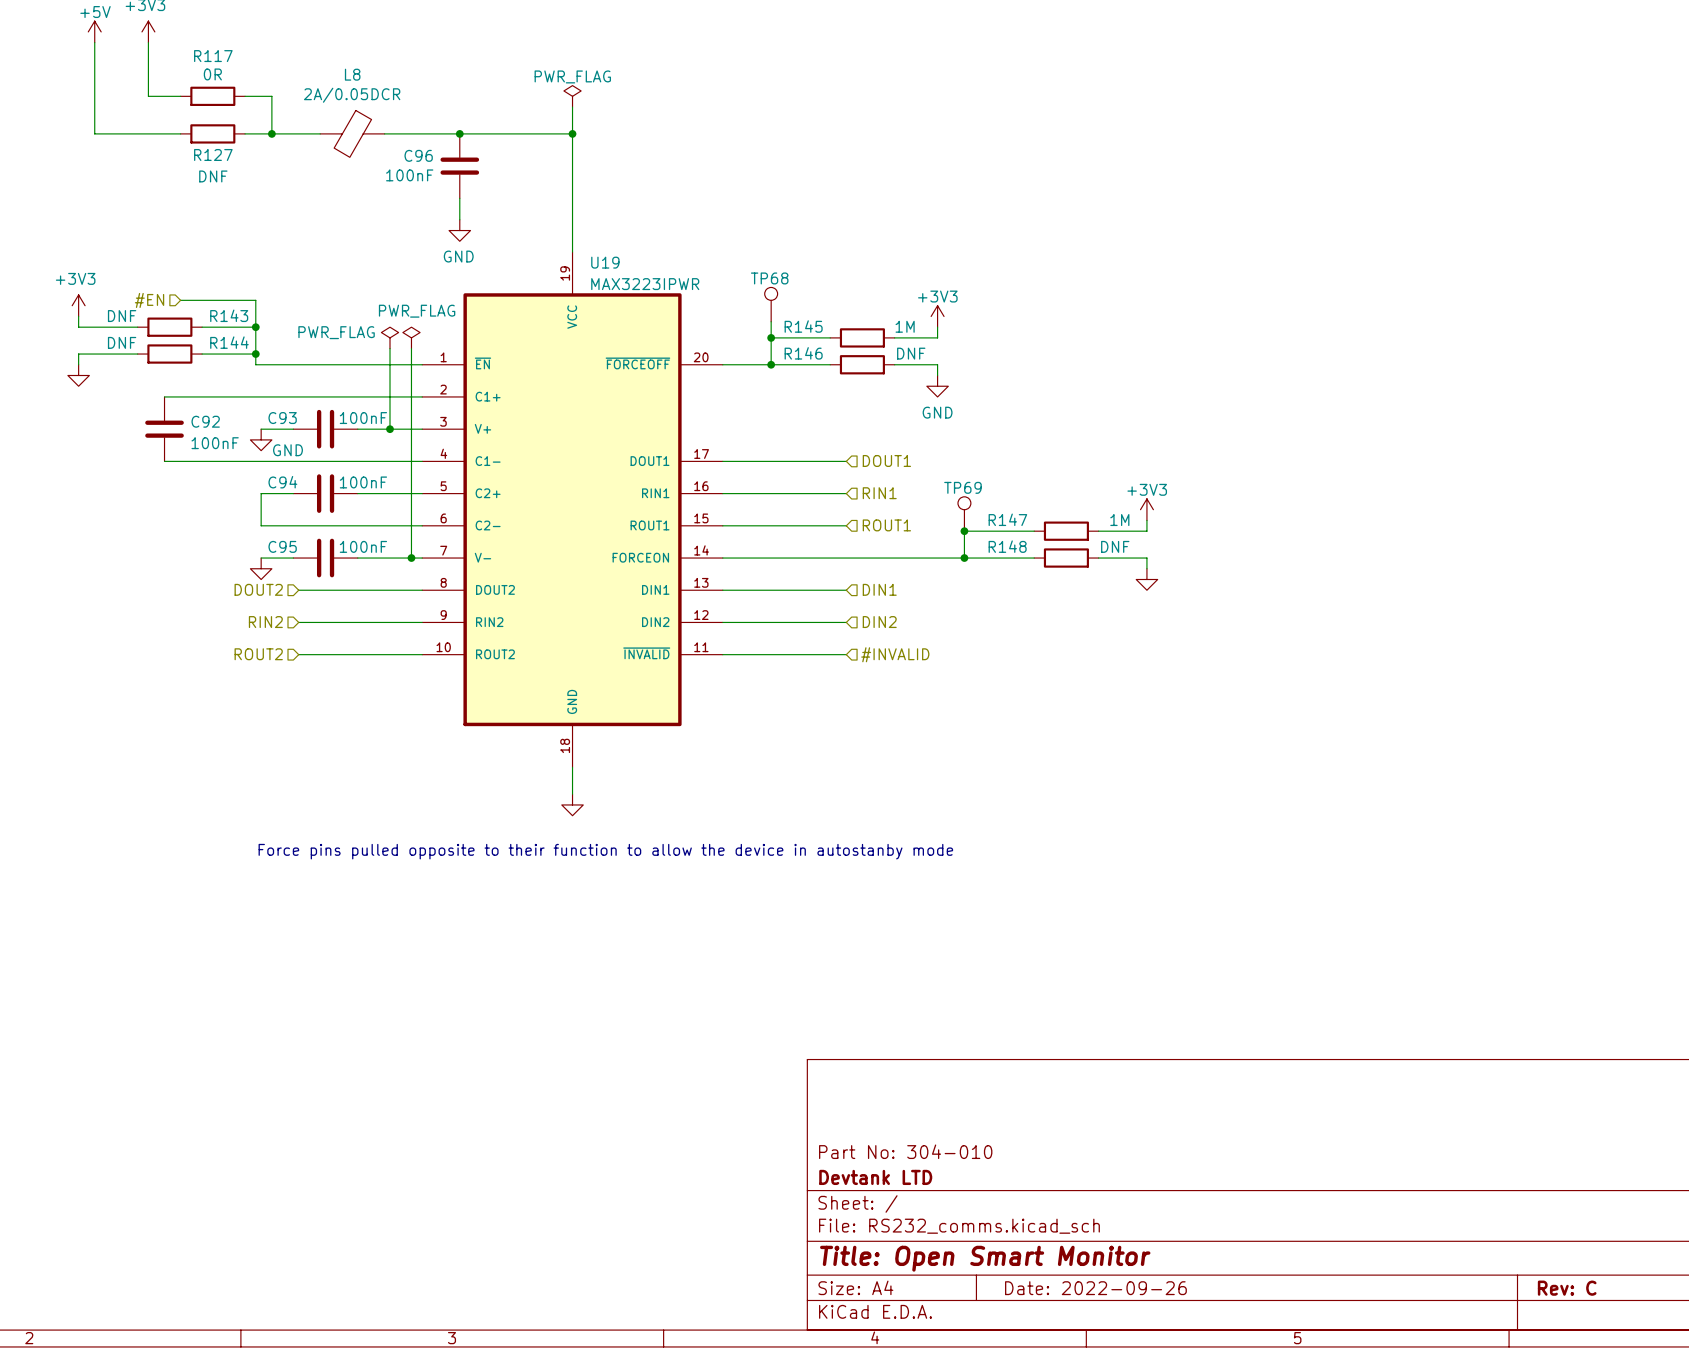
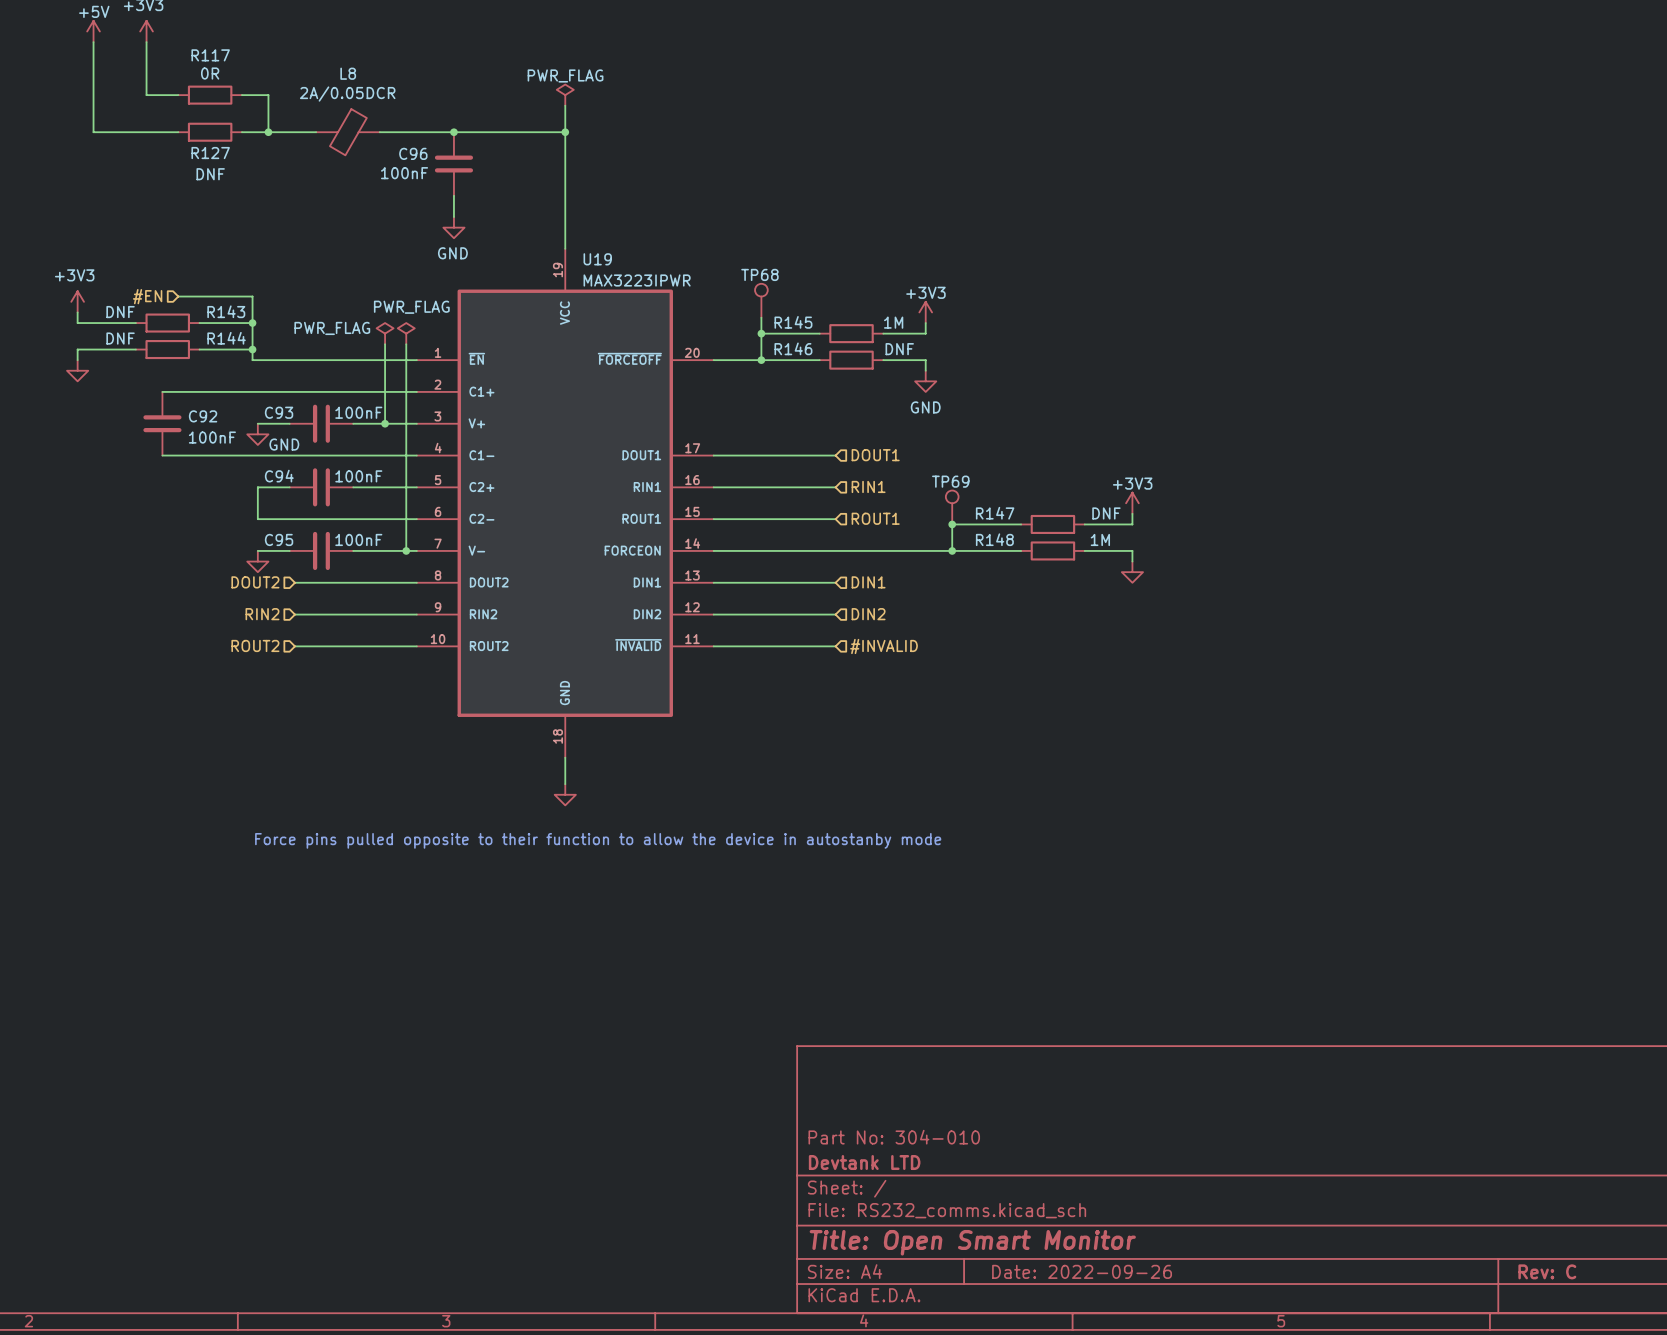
R147 value: 1M (1119, 520) -> DNF (1106, 513)
R148 value: DNF (1115, 546) -> 1M (1100, 539)

